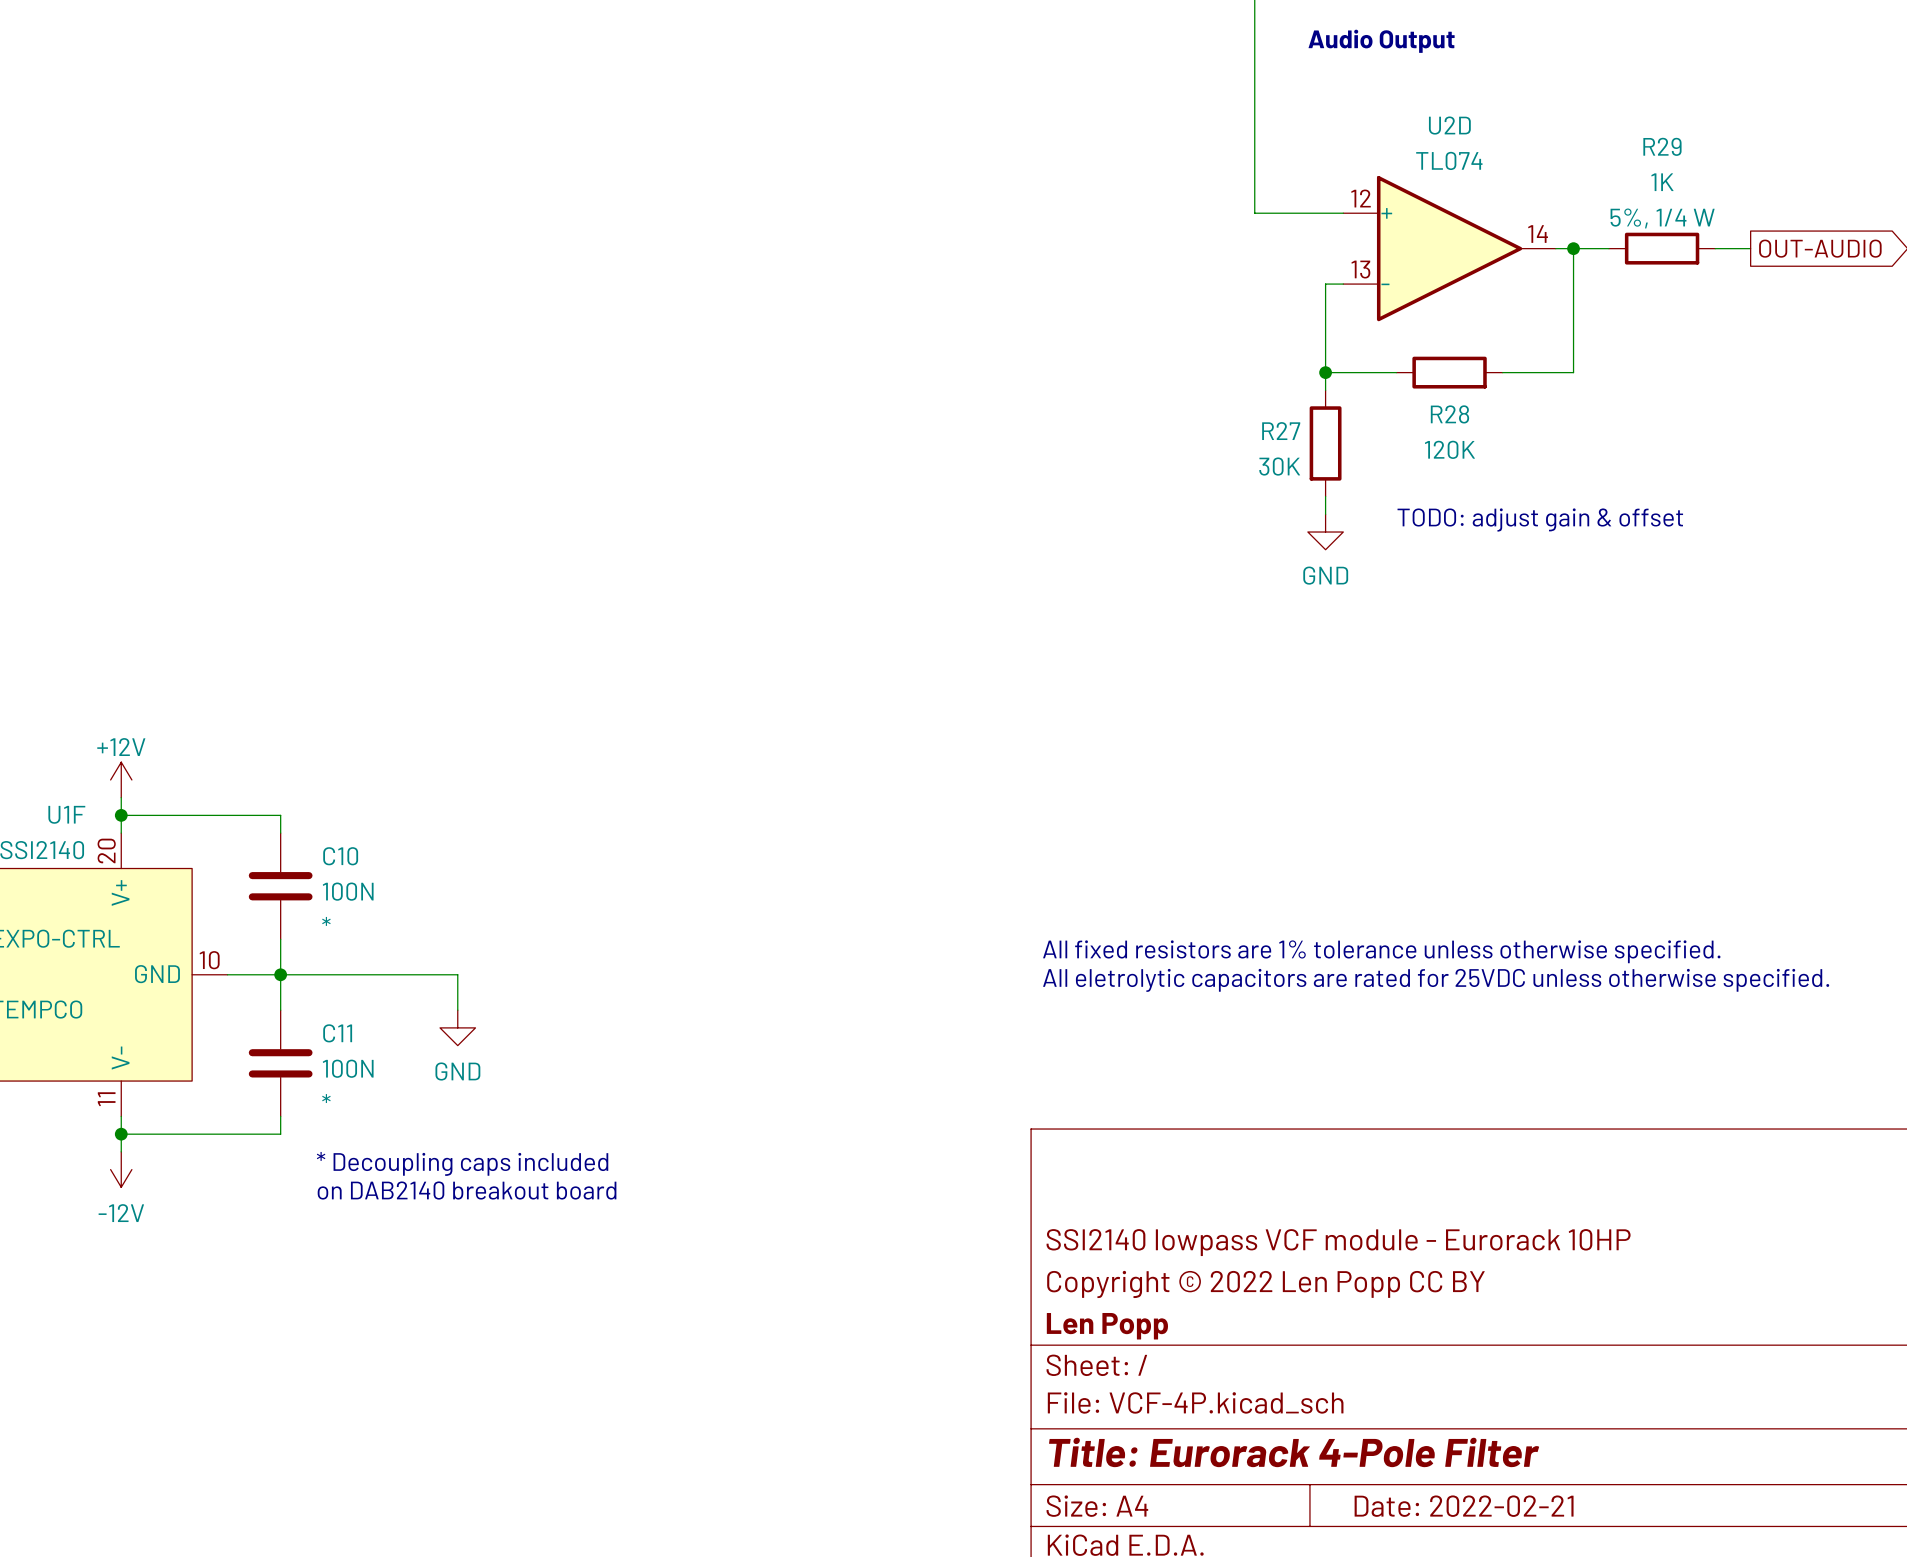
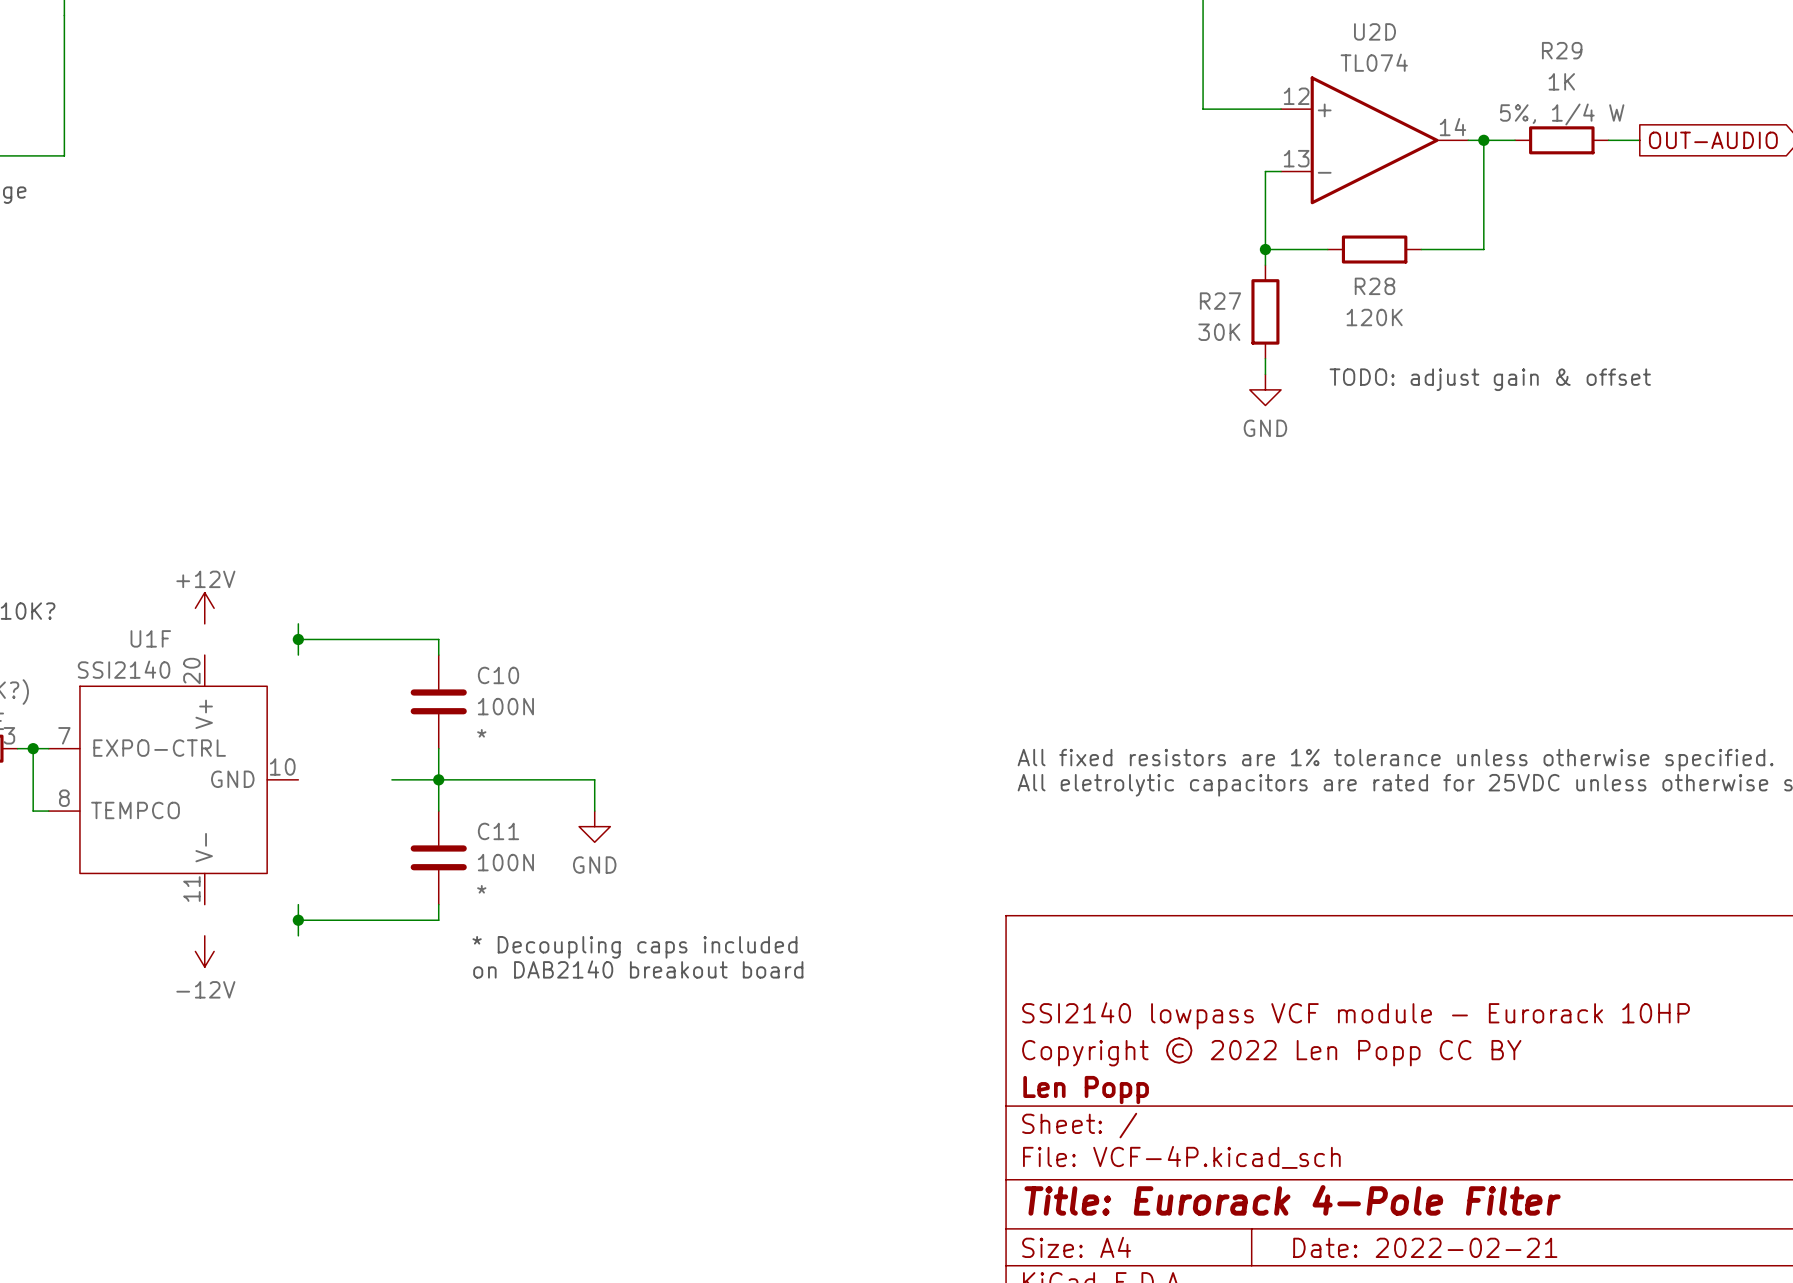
wire: (121, 797) (121, 833) -> (298, 623) (298, 655)
wire: (121, 815) (227, 815) -> none
junction: (121, 815) -> none
junction: none -> (298, 639)
wire: (280, 815) (280, 833) -> (345, 639) (438, 639) (438, 655)
C10 position: (280, 886) -> (438, 701)
wire: (280, 939) (280, 1010) -> (438, 748) (438, 811)
wire: (227, 974) (333, 974) -> none
junction: (280, 974) -> none
junction: none -> (438, 779)
wire: (457, 974) (457, 1010) -> (501, 779) (594, 779) (594, 811)
power symbol position: GND (457, 1027) -> GND (594, 826)
C11 position: (280, 1063) -> (438, 857)
wire: (121, 1116) (121, 1151) -> (298, 904) (298, 935)
wire: (280, 1116) (280, 1134) -> (438, 904) (438, 920) (345, 920)
wire: (121, 1134) (227, 1134) -> none
junction: (121, 1134) -> none
junction: none -> (298, 920)
text position: * Decoupling caps included (462, 1163) -> * Decoupling caps included (634, 947)
text position: on DAB2140 breakout board (467, 1190) -> on DAB2140 breakout board (638, 969)

